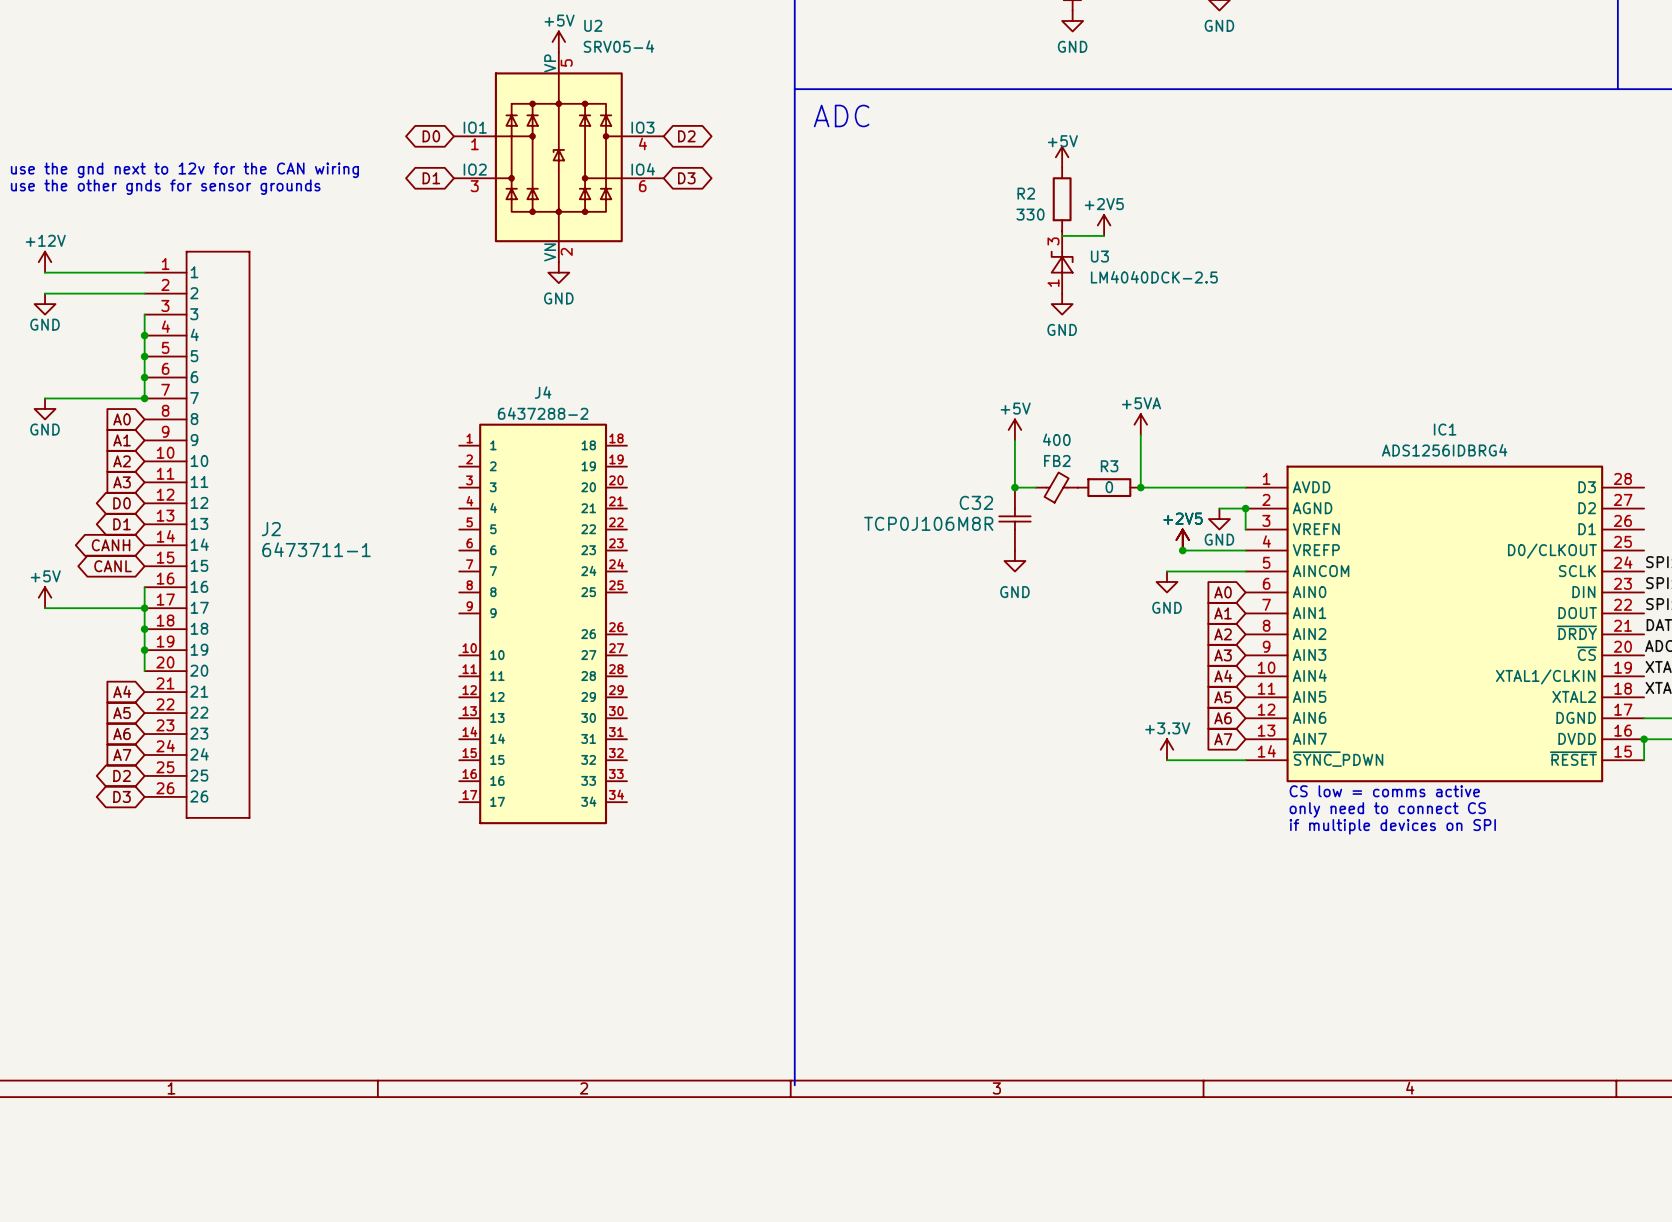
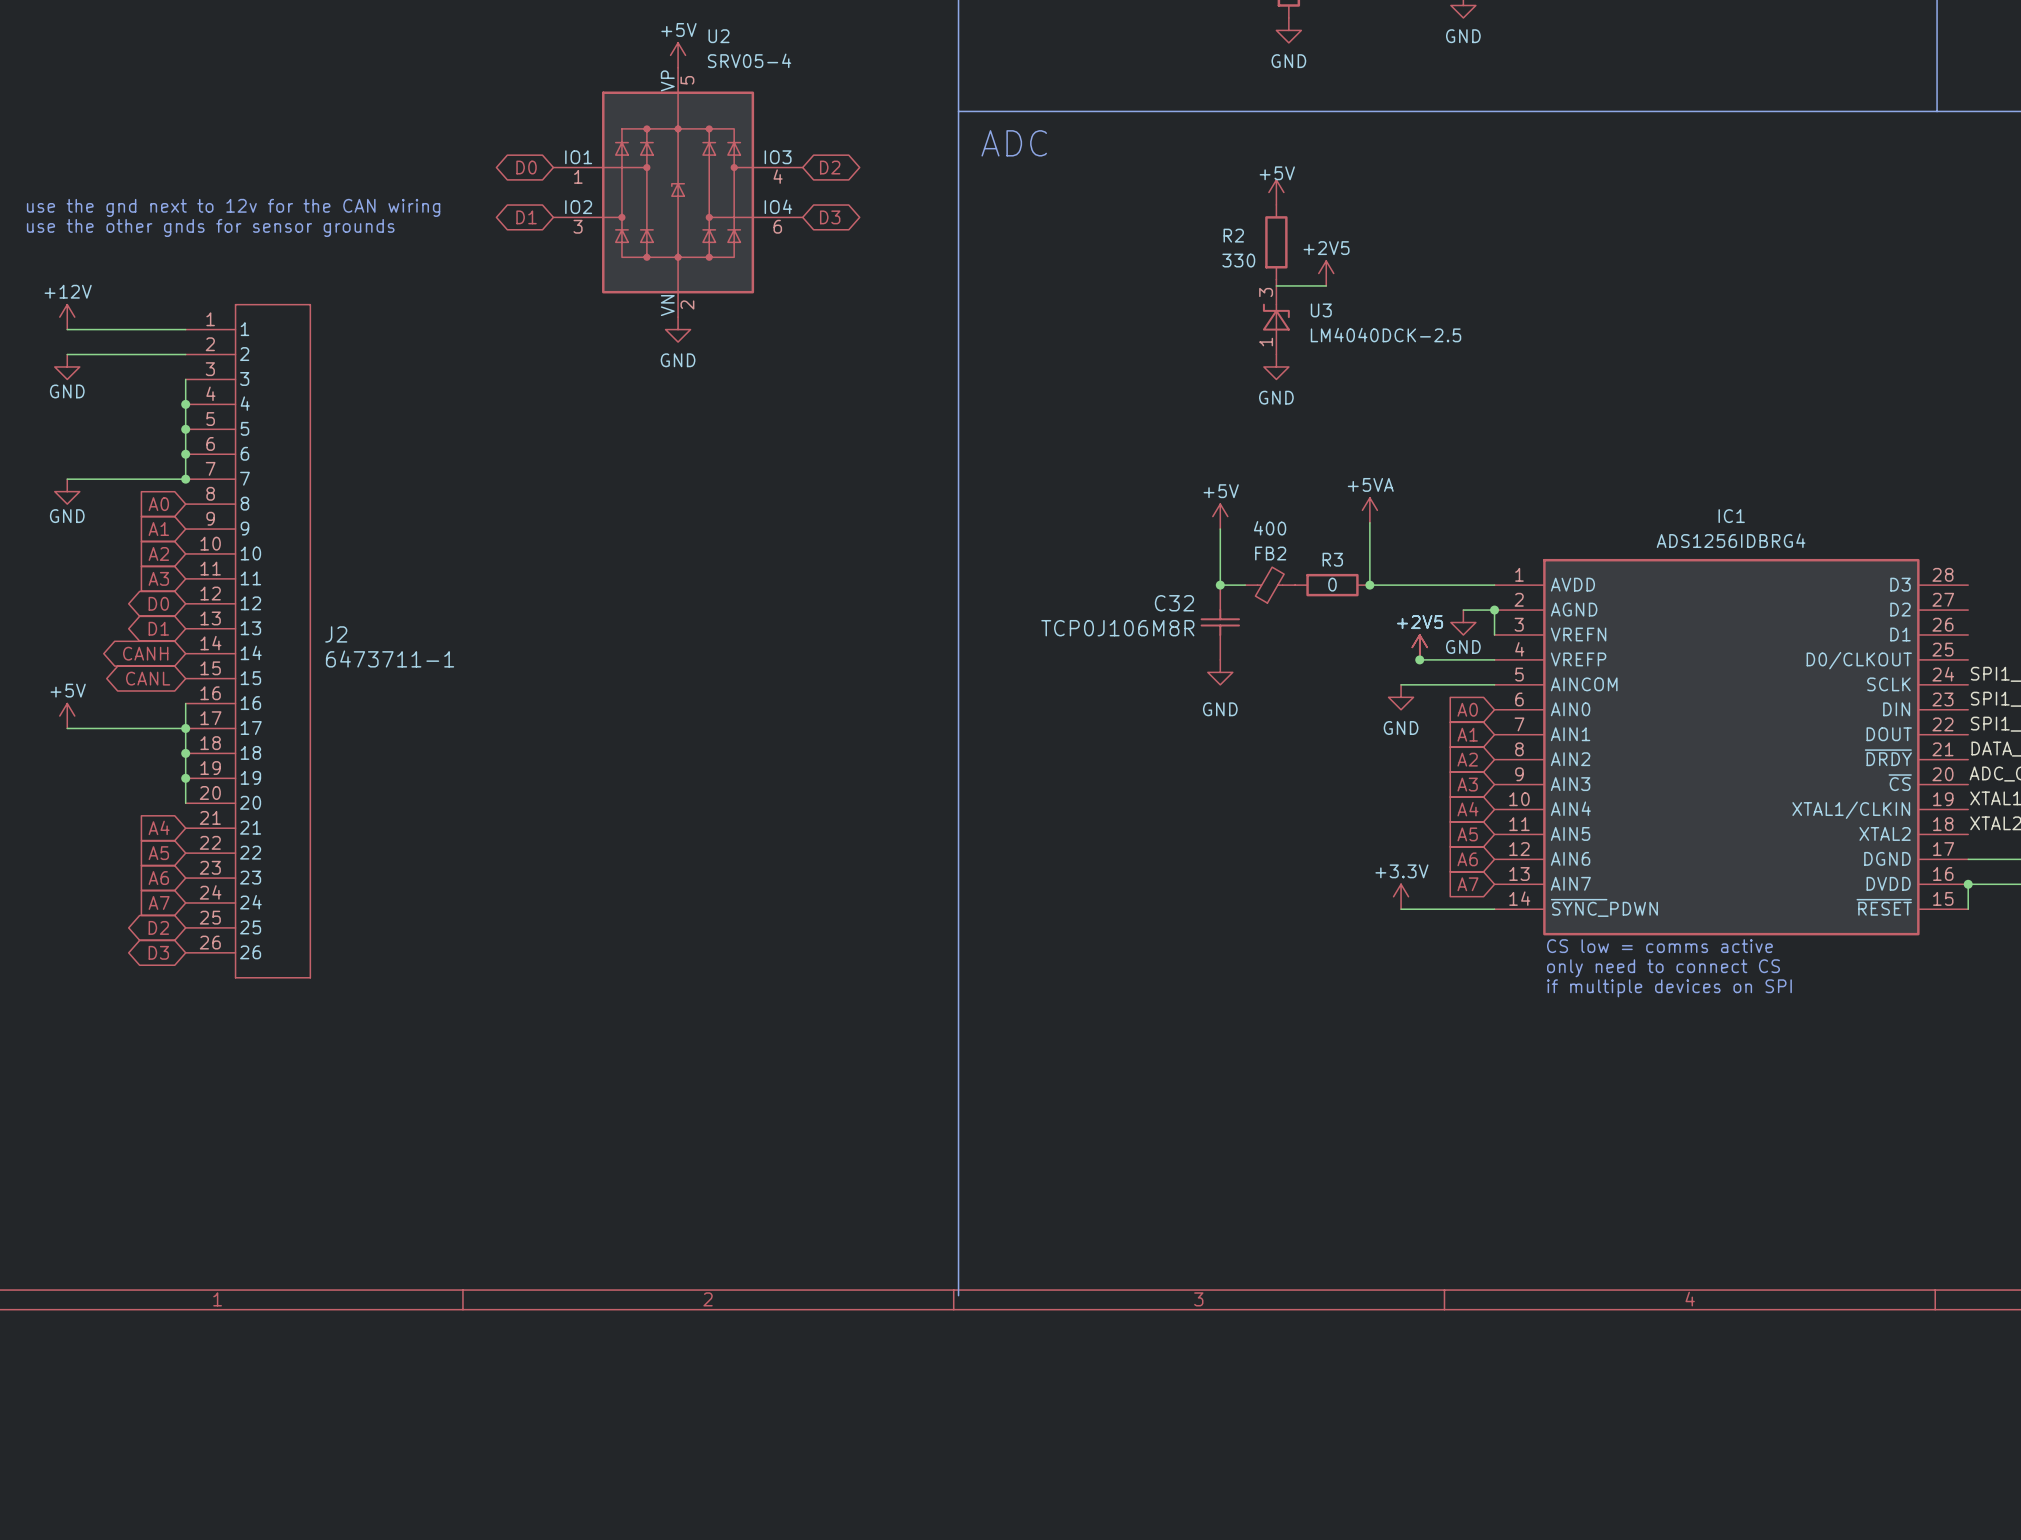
J4: 6437288-2 (543, 623) -> none

